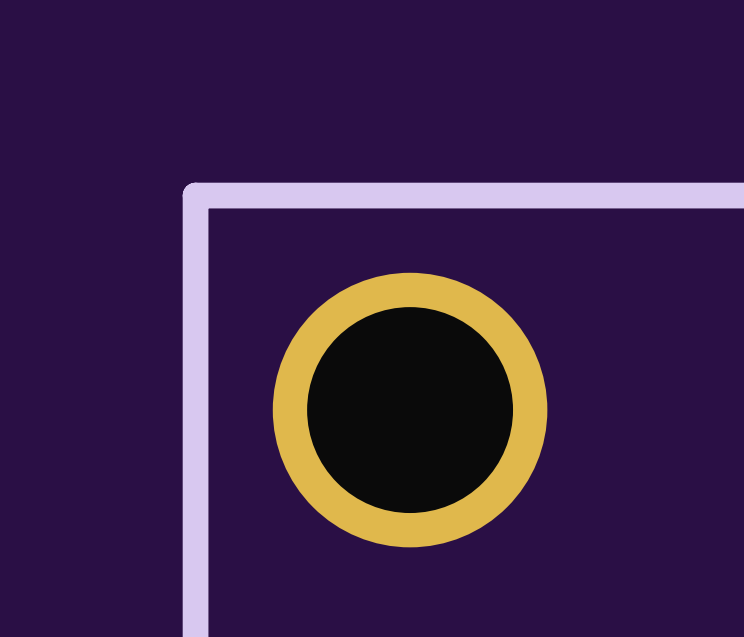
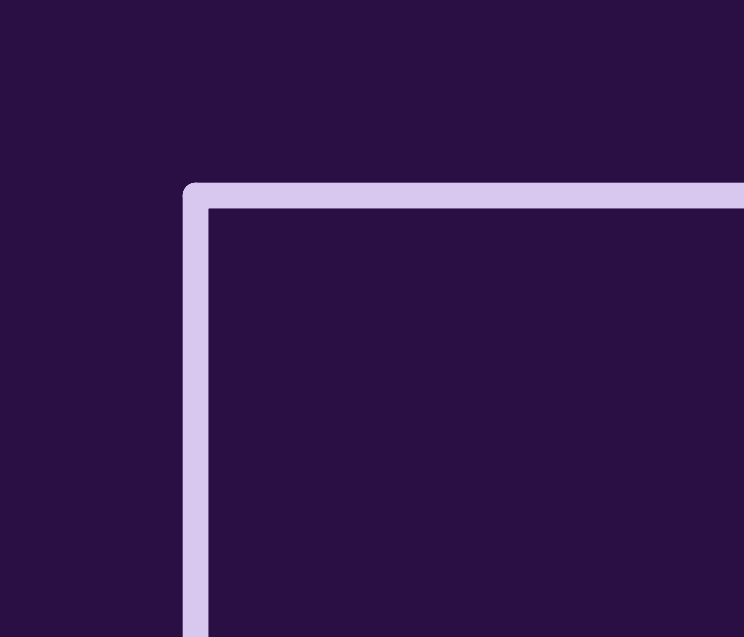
part: (410, 410) -> none

